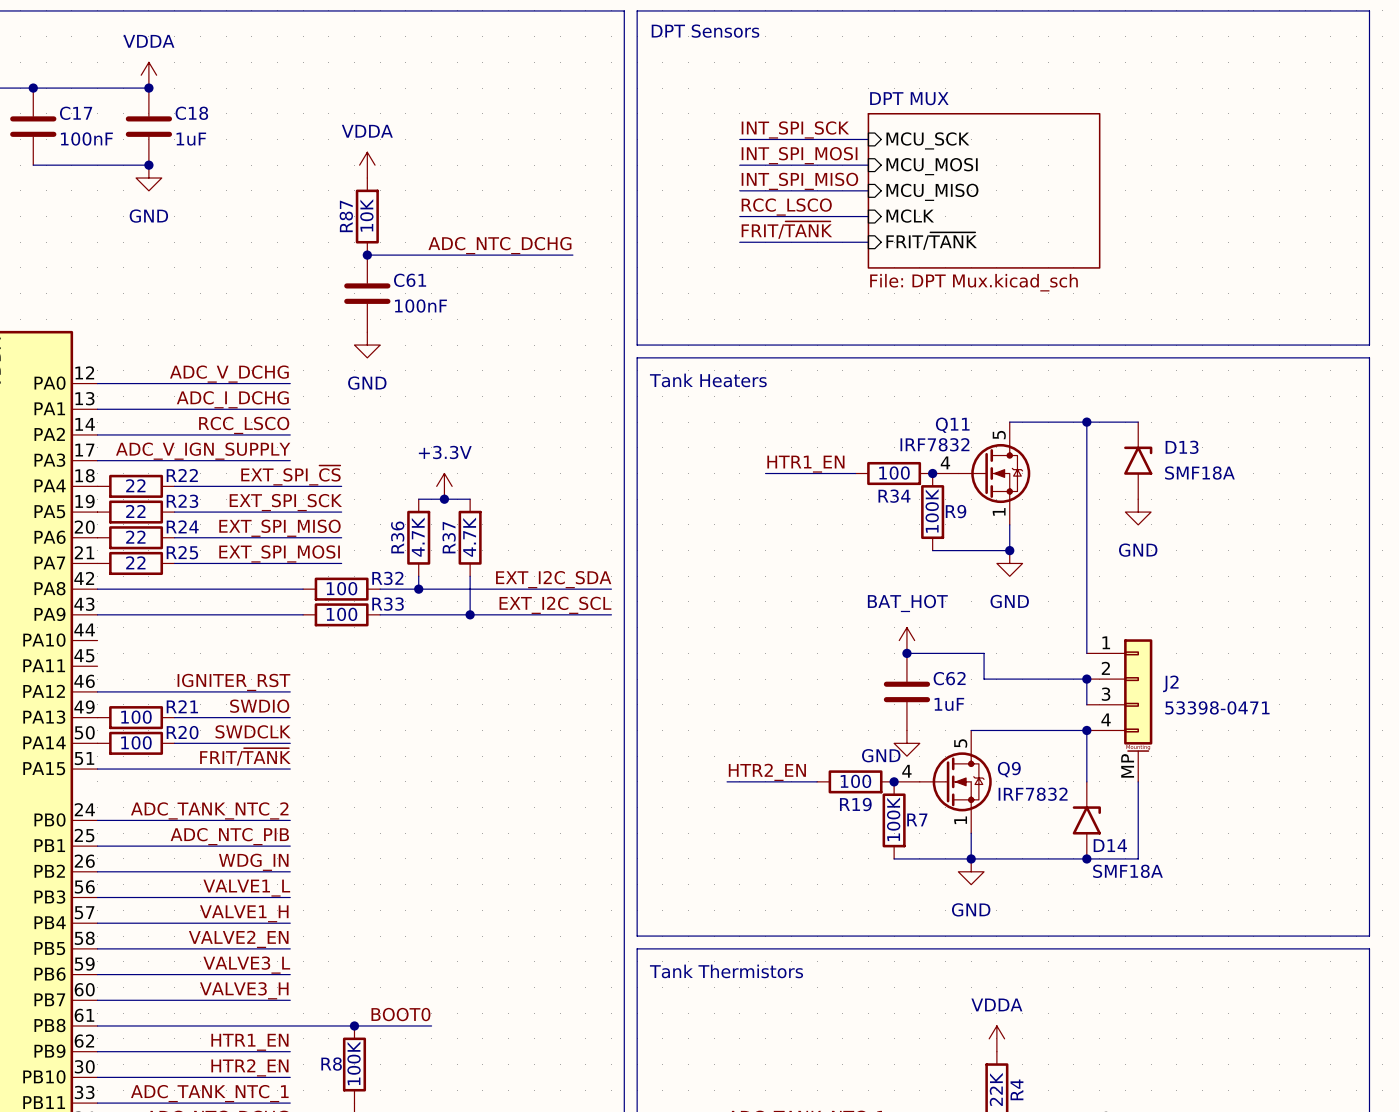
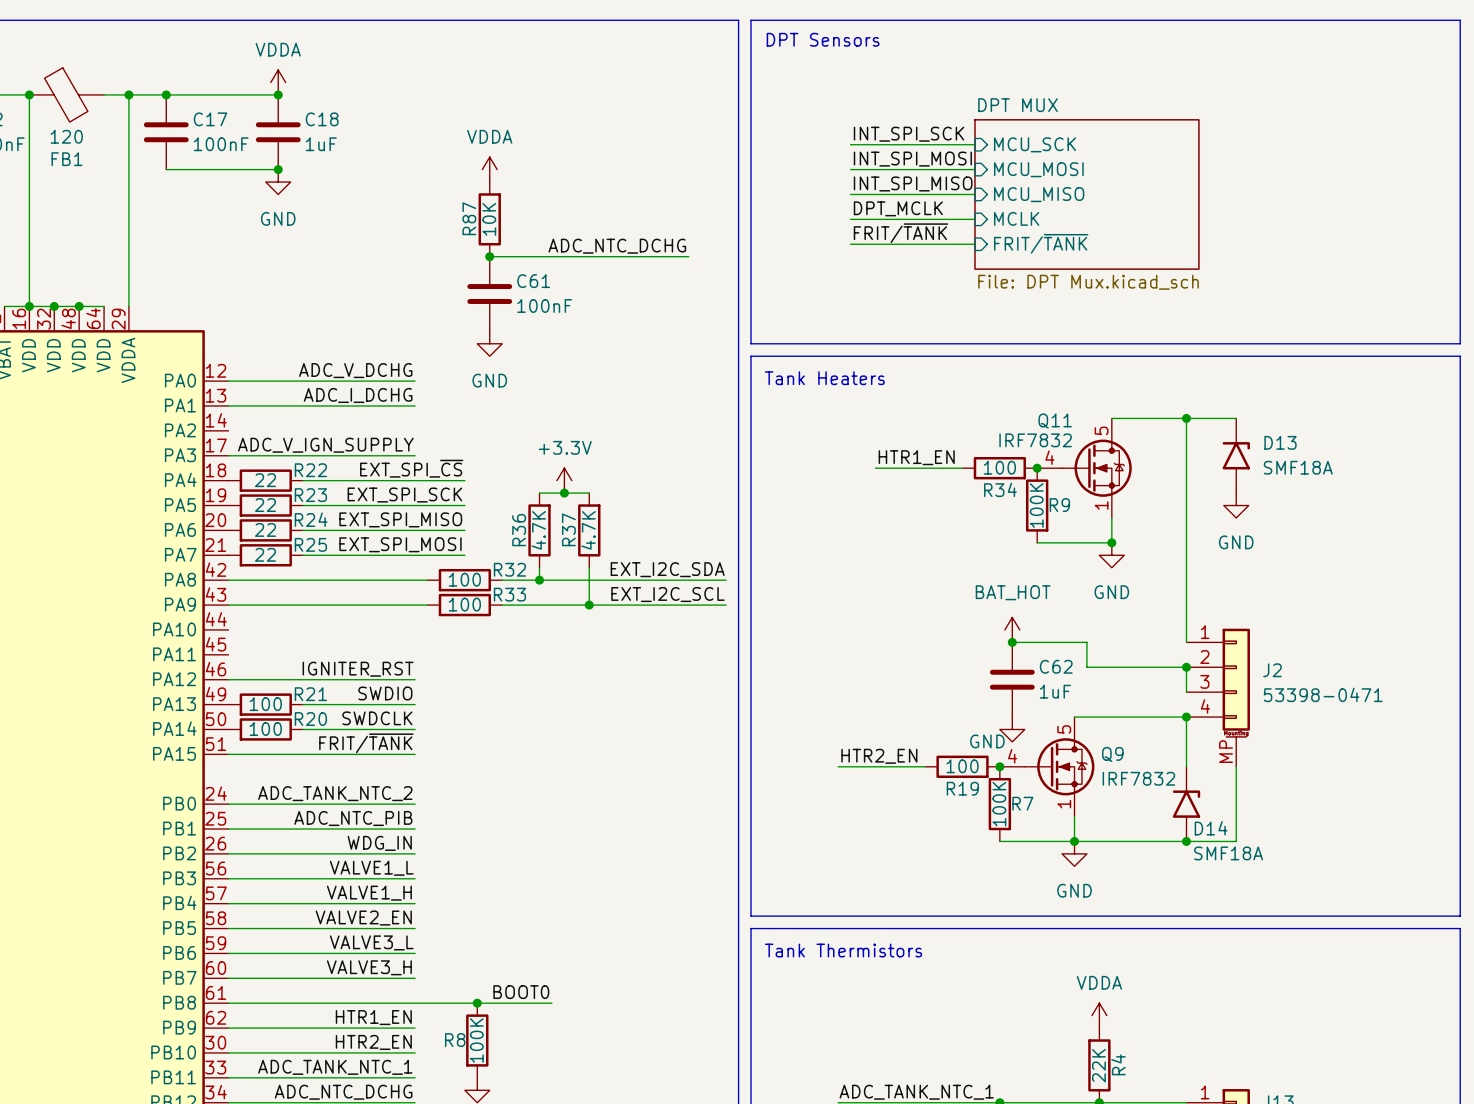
label: RCC_LSCO (786, 207) -> DPT_MCLK (898, 208)
label: RCC_LSCO (244, 425) -> none
wire: (97, 434) (290, 434) -> none

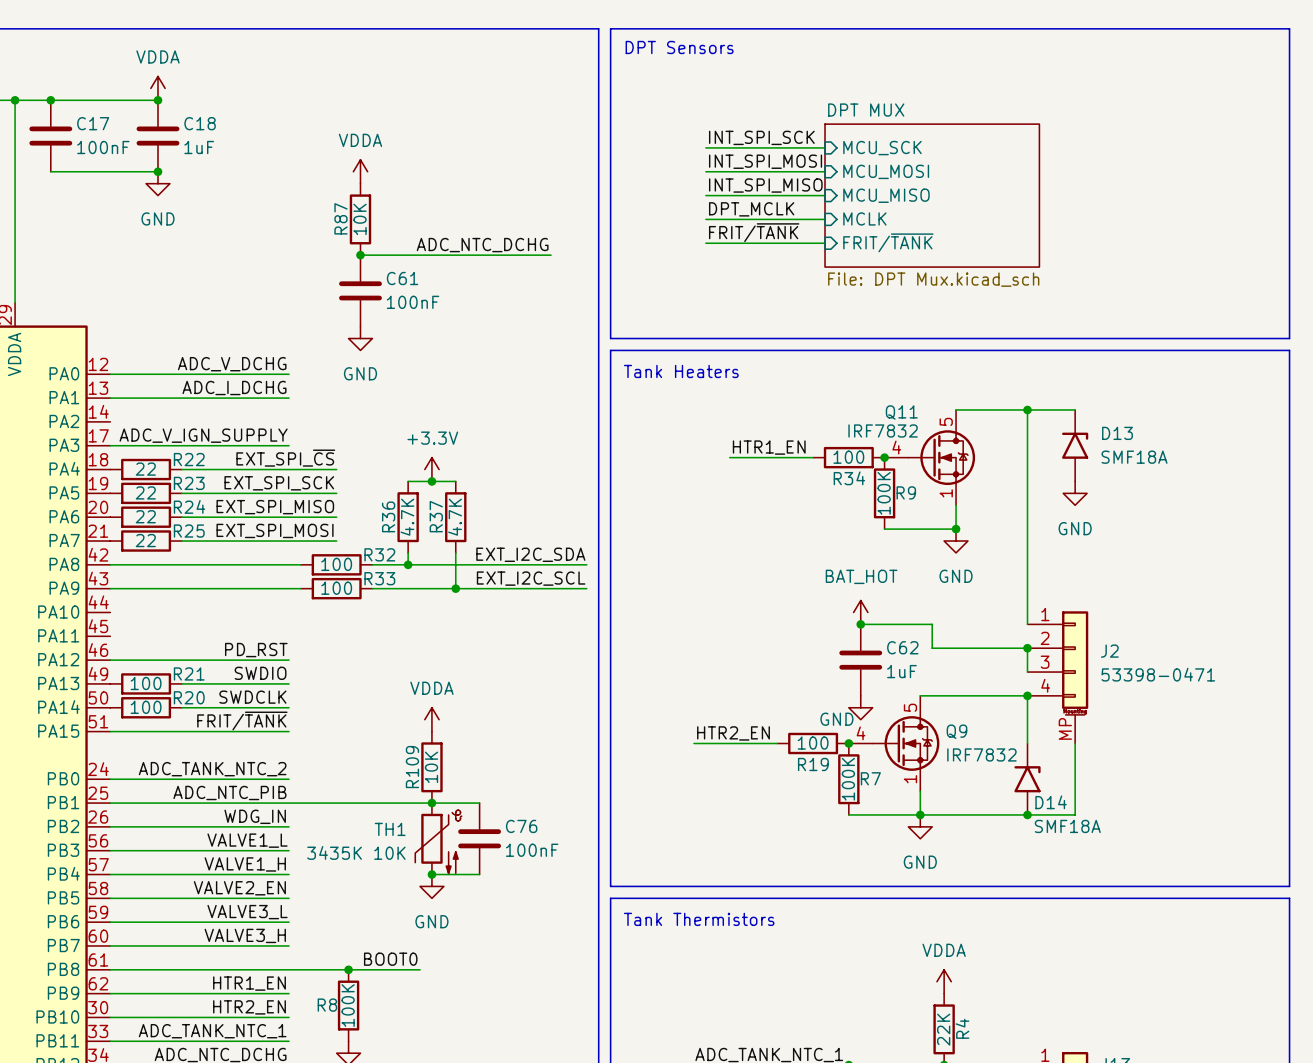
label: IGNITER_RST (358, 669) -> PD_RST (256, 650)
power symbol: none -> VDDA (431, 719)
R109: none -> 10K (431, 767)
wire: none -> (289, 803) (479, 803)
junction: none -> (431, 803)
TH1: none -> 3435K 10K (438, 838)
C76: none -> 100nF (479, 838)
wire: none -> (431, 874) (479, 874)
junction: none -> (431, 874)
power symbol: none -> GND (431, 886)

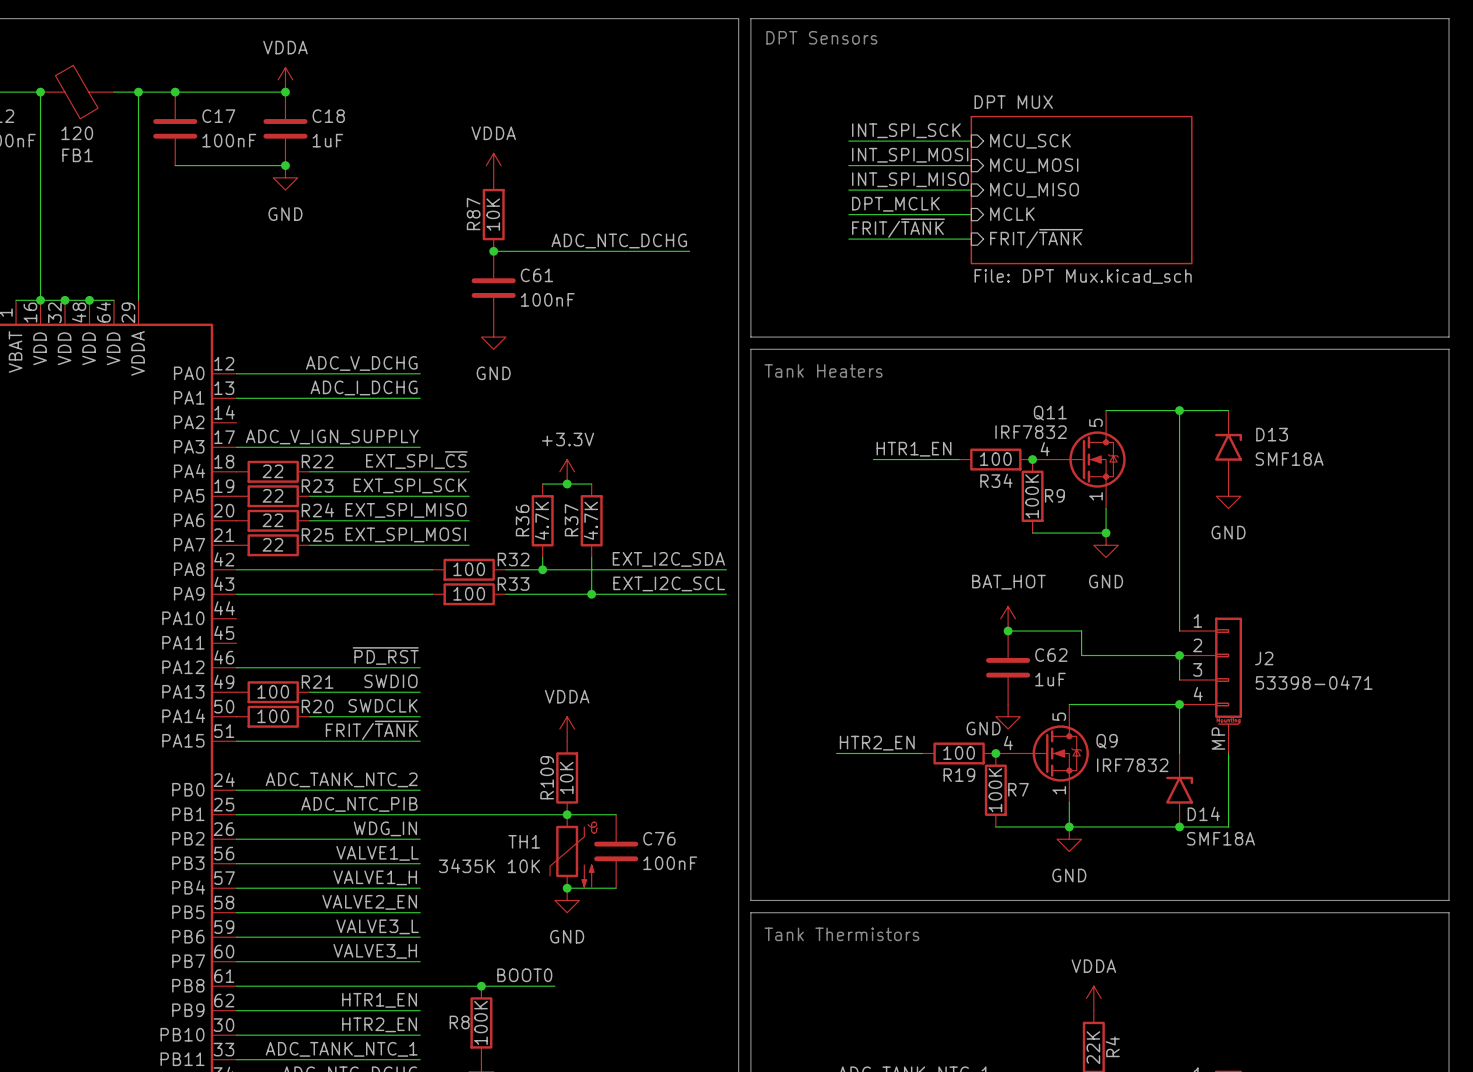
label: PD_RST (256, 650) -> ~{PD_RST} (385, 656)

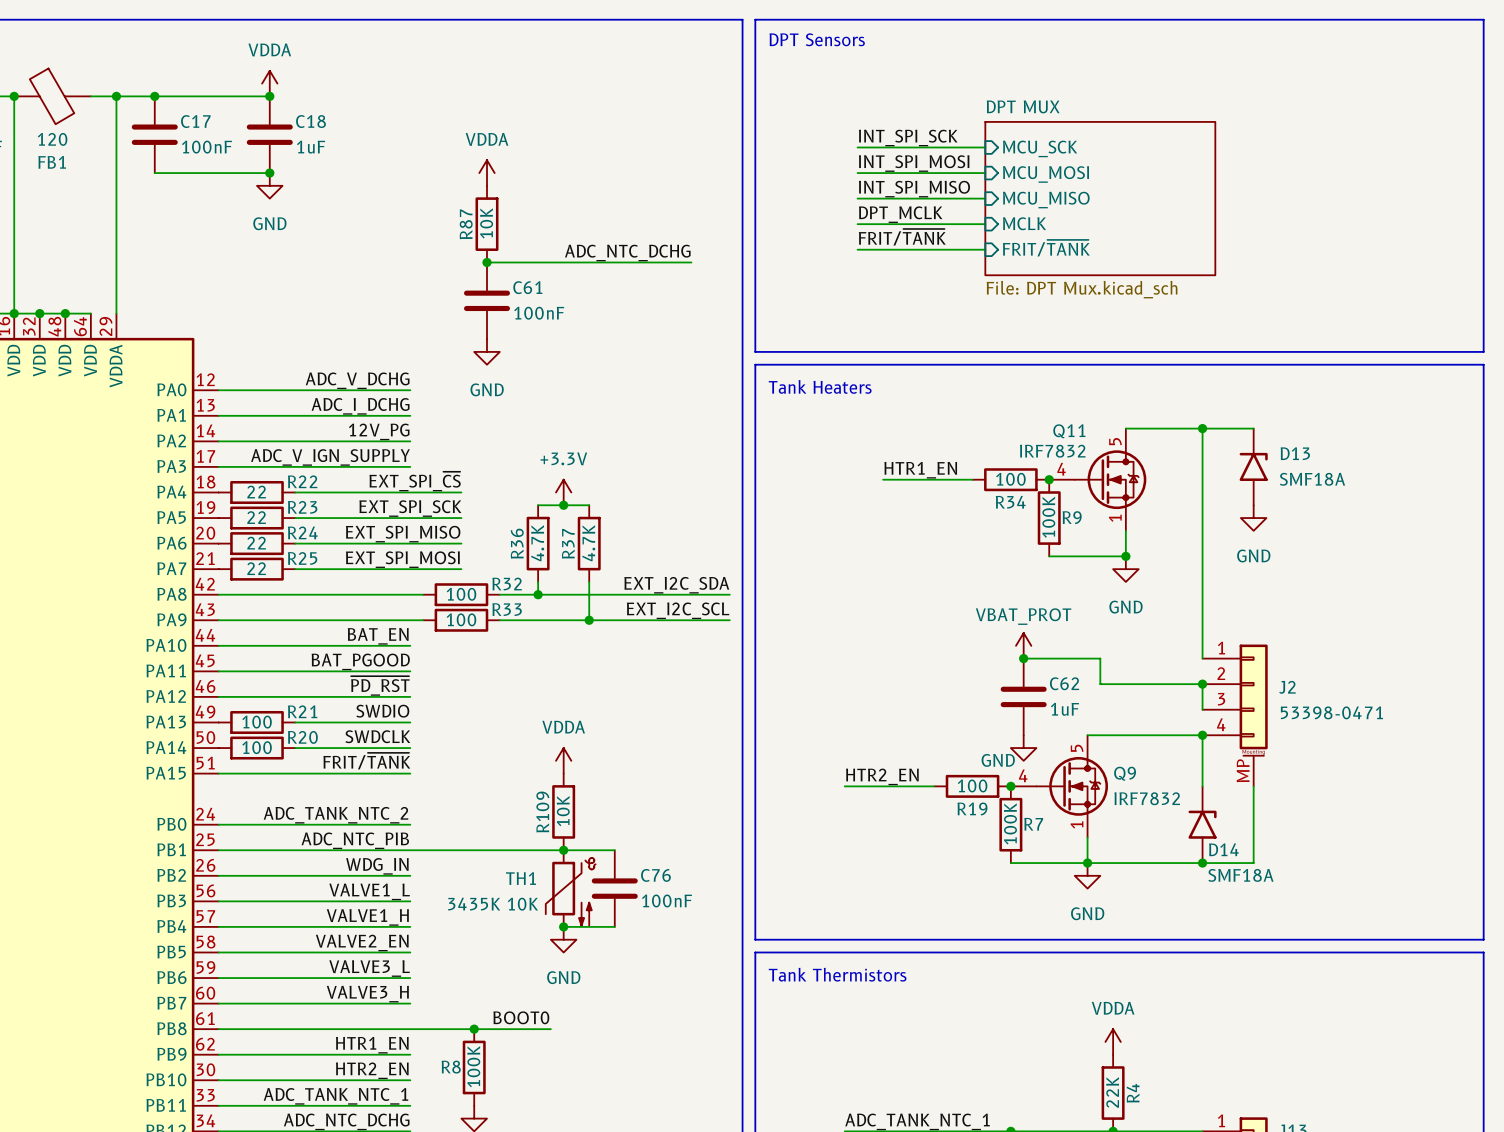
label: none -> 12V_PG (379, 431)
wire: none -> (218, 441) (410, 441)
label: none -> BAT_EN (378, 636)
wire: none -> (218, 645) (410, 645)
power symbol: BAT_HOT (1008, 618) -> VBAT_PROT (1023, 645)
label: none -> BAT_PGOOD (360, 661)
wire: none -> (218, 671) (410, 671)

